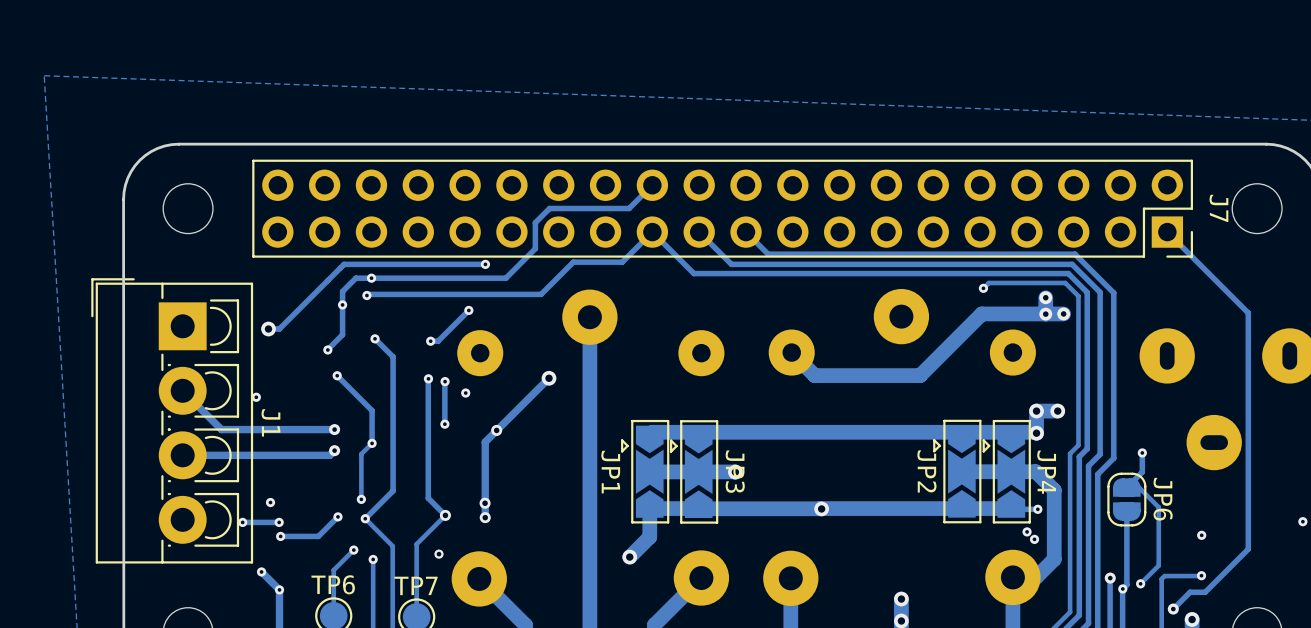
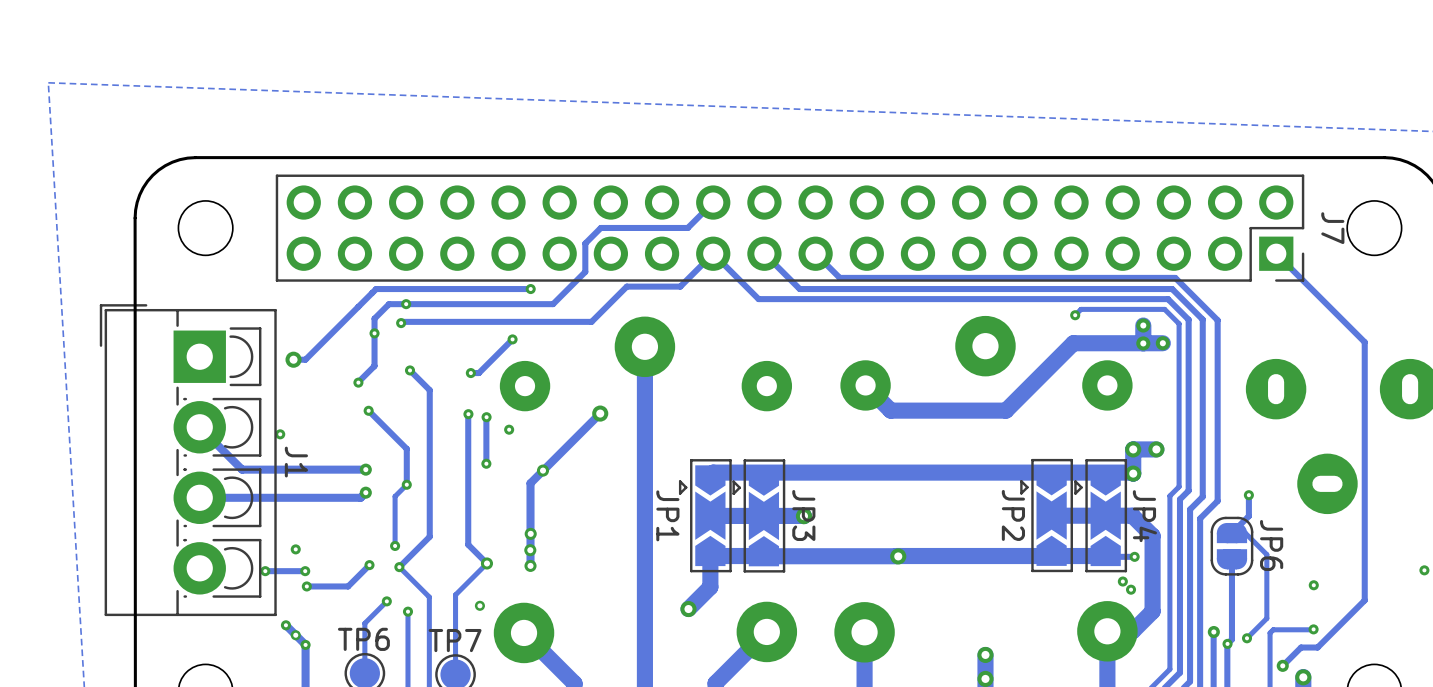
via: none -> (530, 533)
via: none -> (295, 635)

